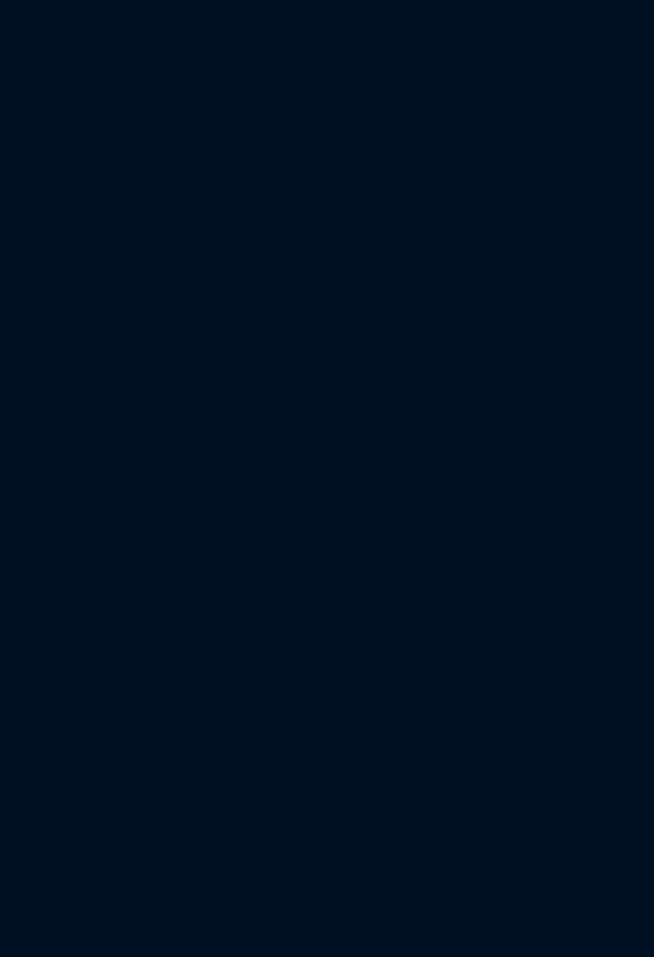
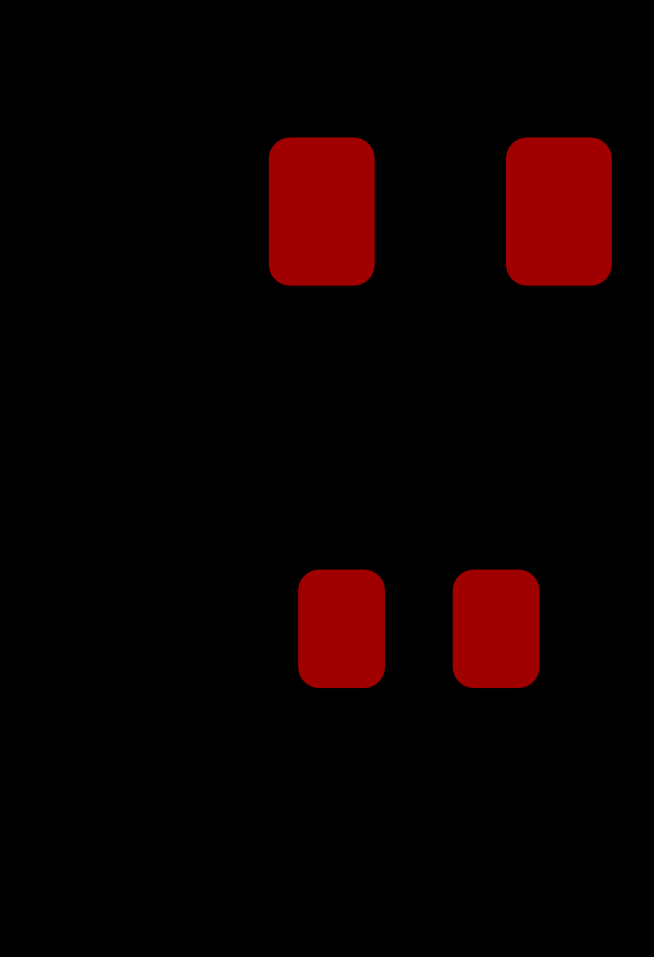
part: none -> (440, 211)
part: none -> (418, 628)

